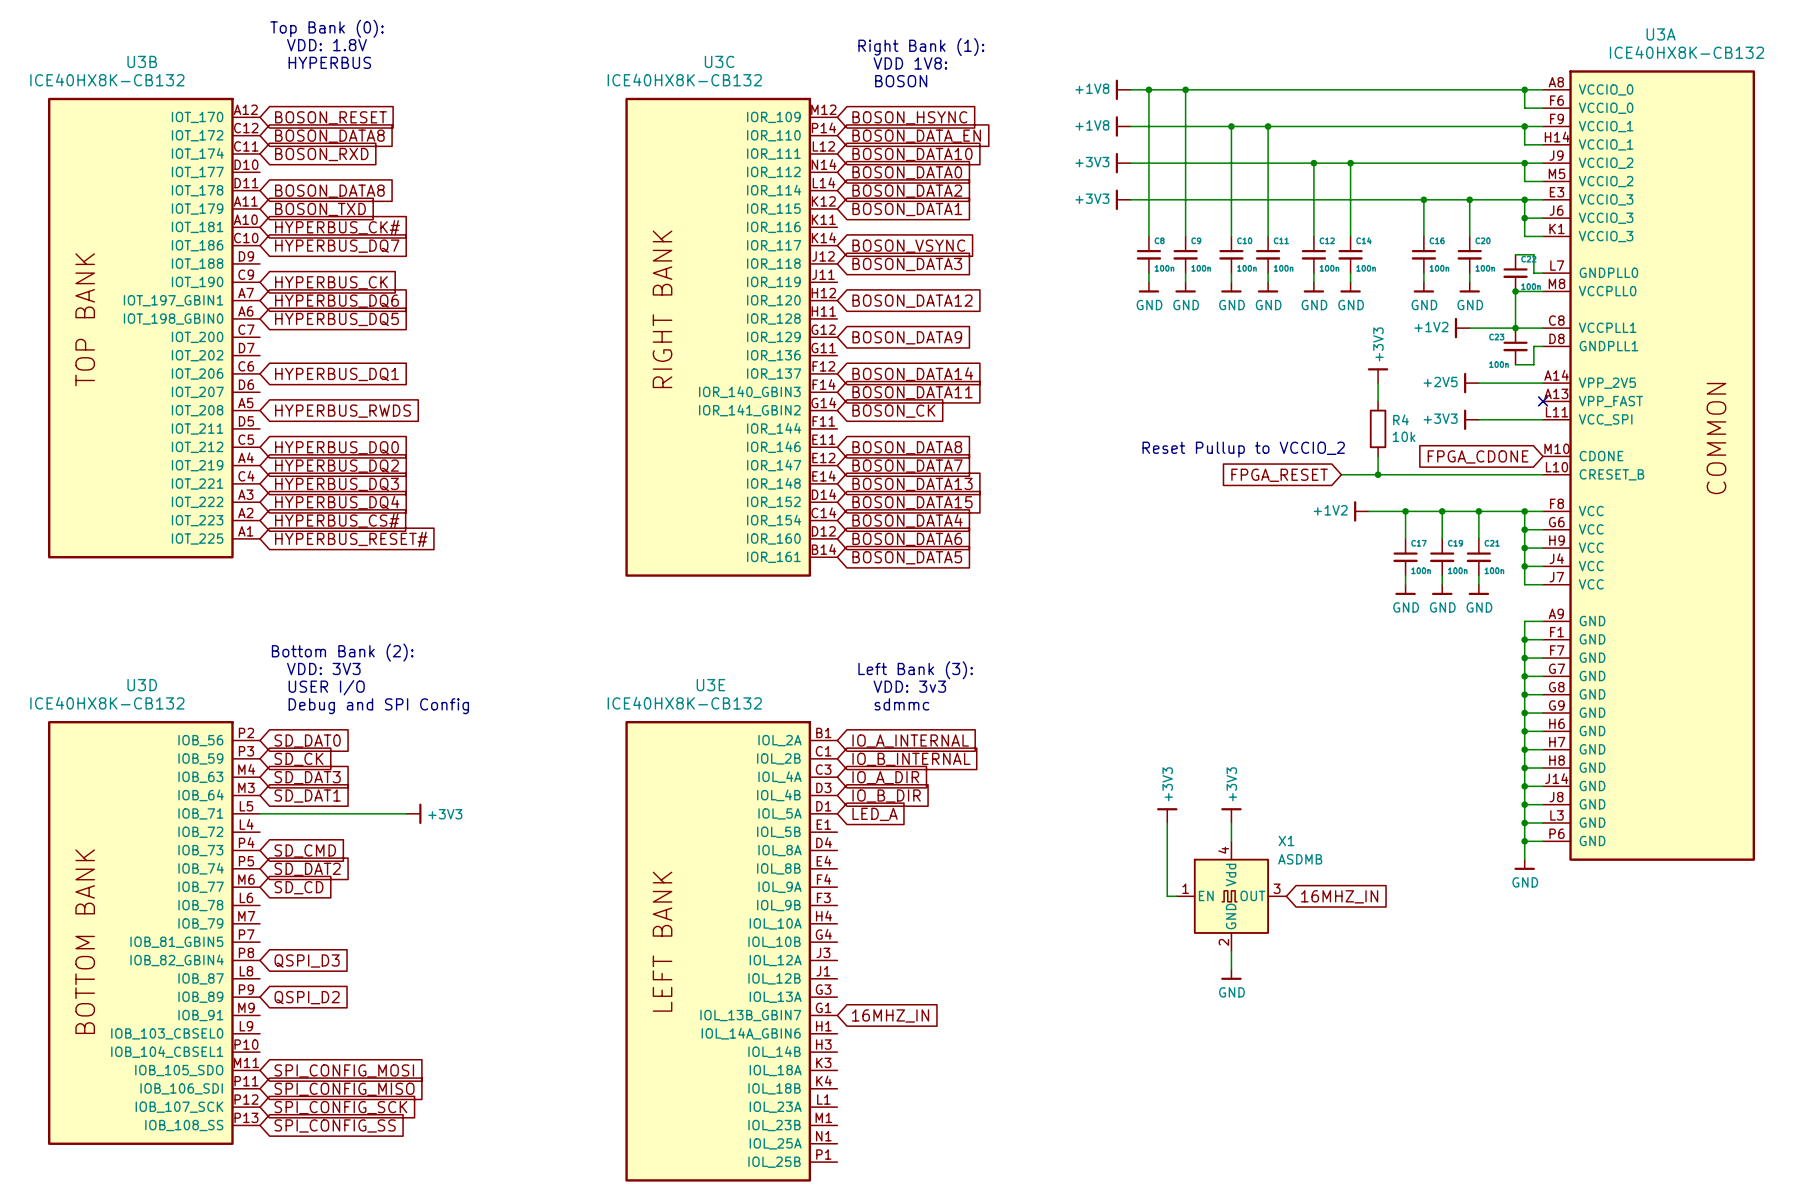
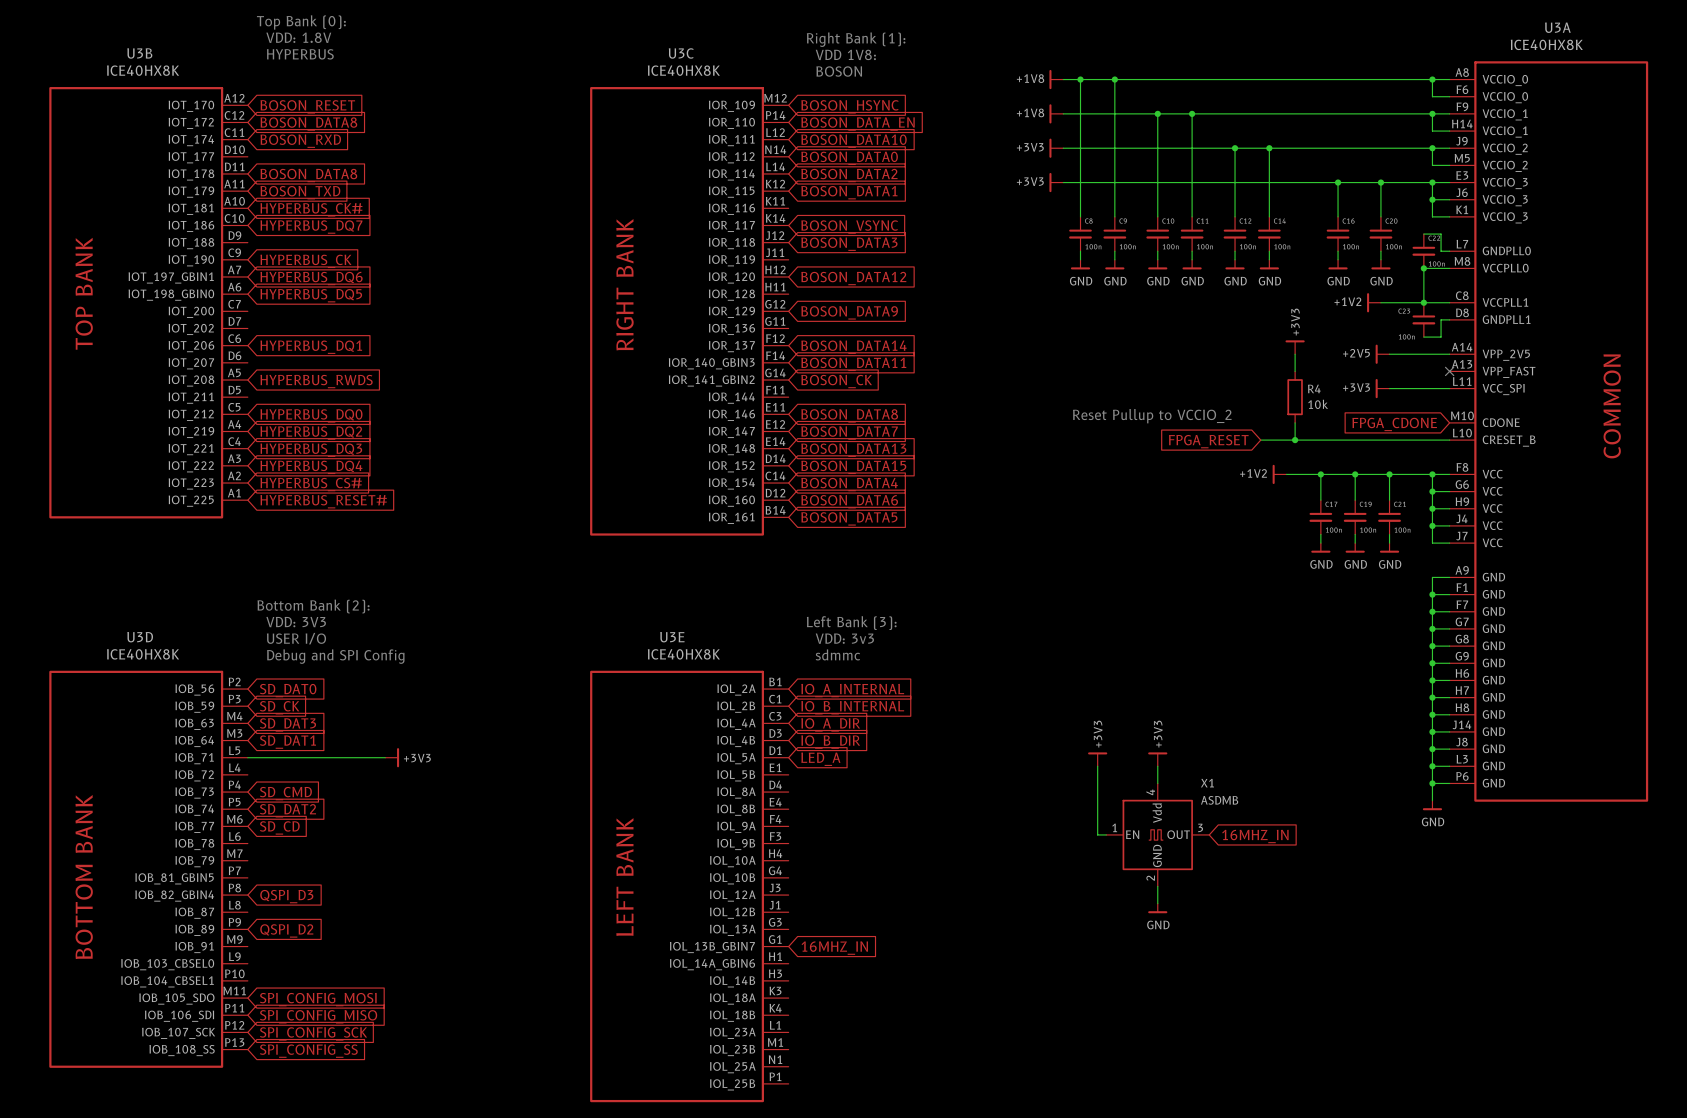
U3A value: ICE40HX8K-CB132 (1686, 52) -> ICE40HX8K (1546, 44)
U3B value: ICE40HX8K-CB132 (107, 79) -> ICE40HX8K (143, 70)
U3C value: ICE40HX8K-CB132 (684, 79) -> ICE40HX8K (683, 70)
U3D value: ICE40HX8K-CB132 (107, 703) -> ICE40HX8K (143, 654)
U3E value: ICE40HX8K-CB132 (684, 703) -> ICE40HX8K (683, 654)

